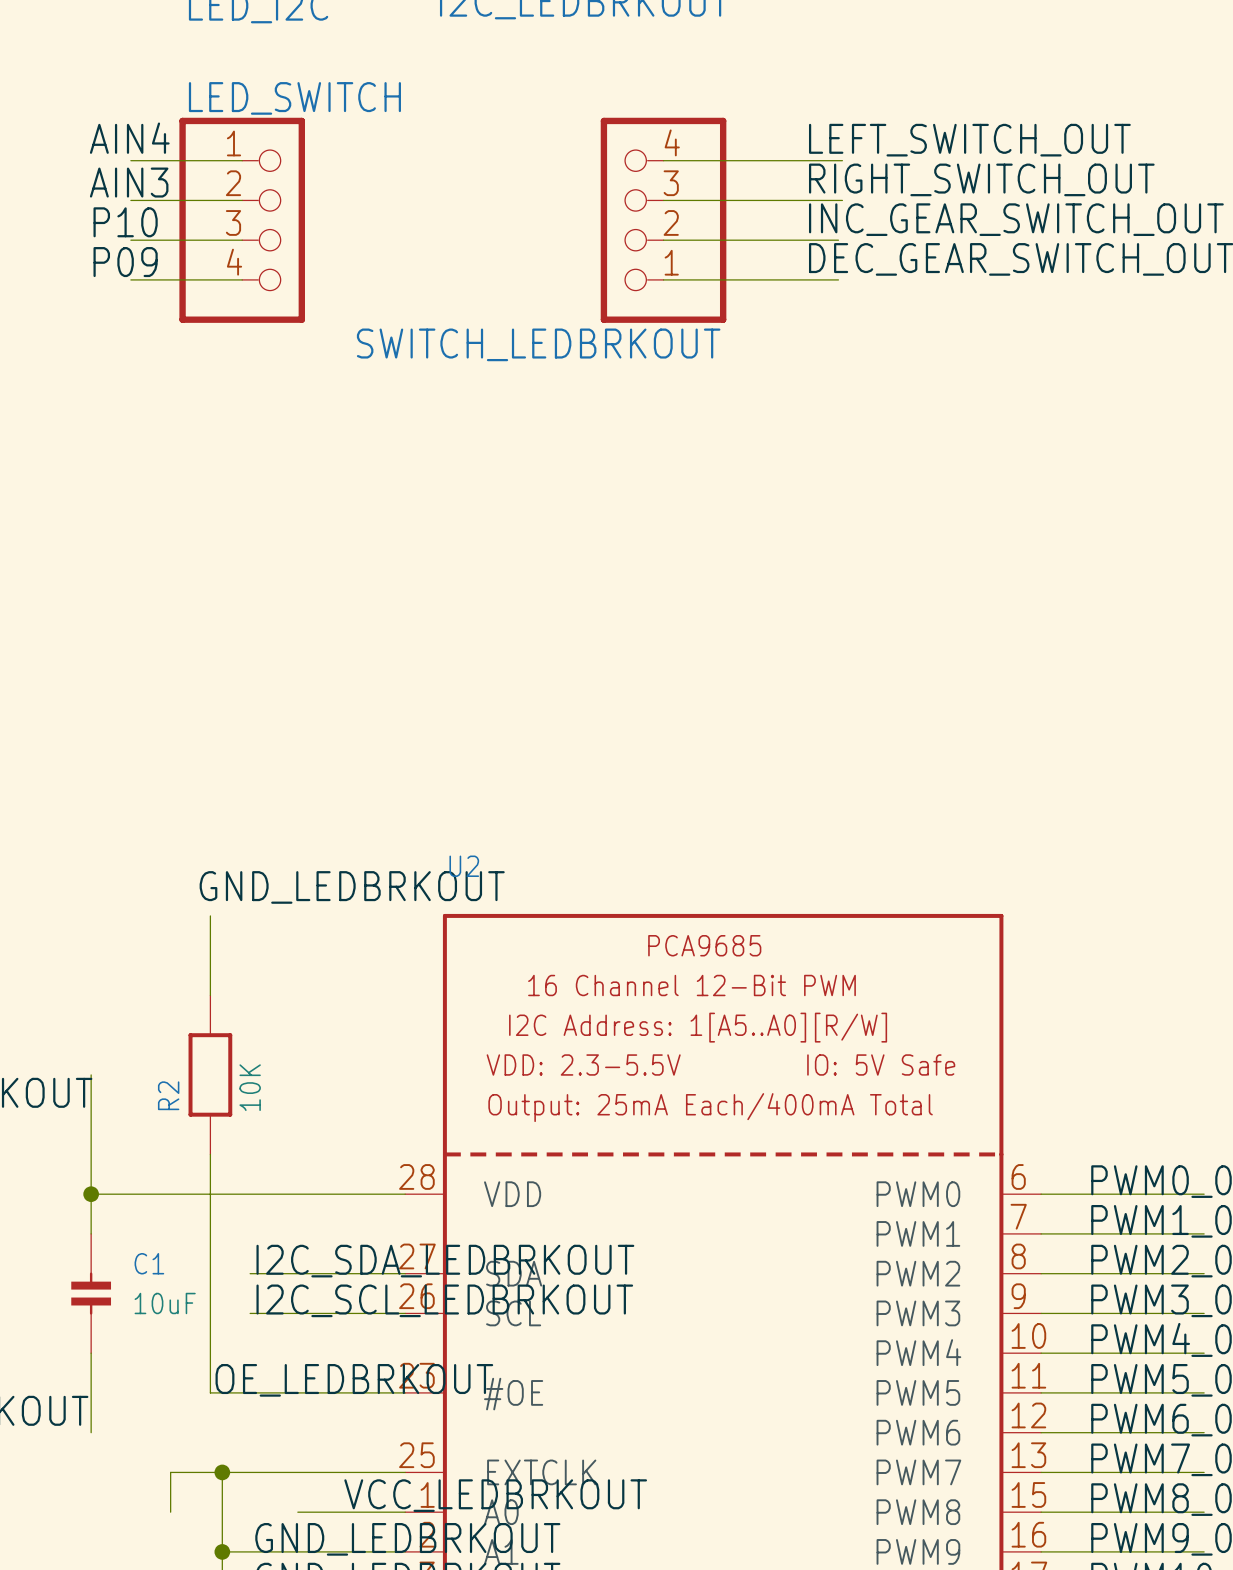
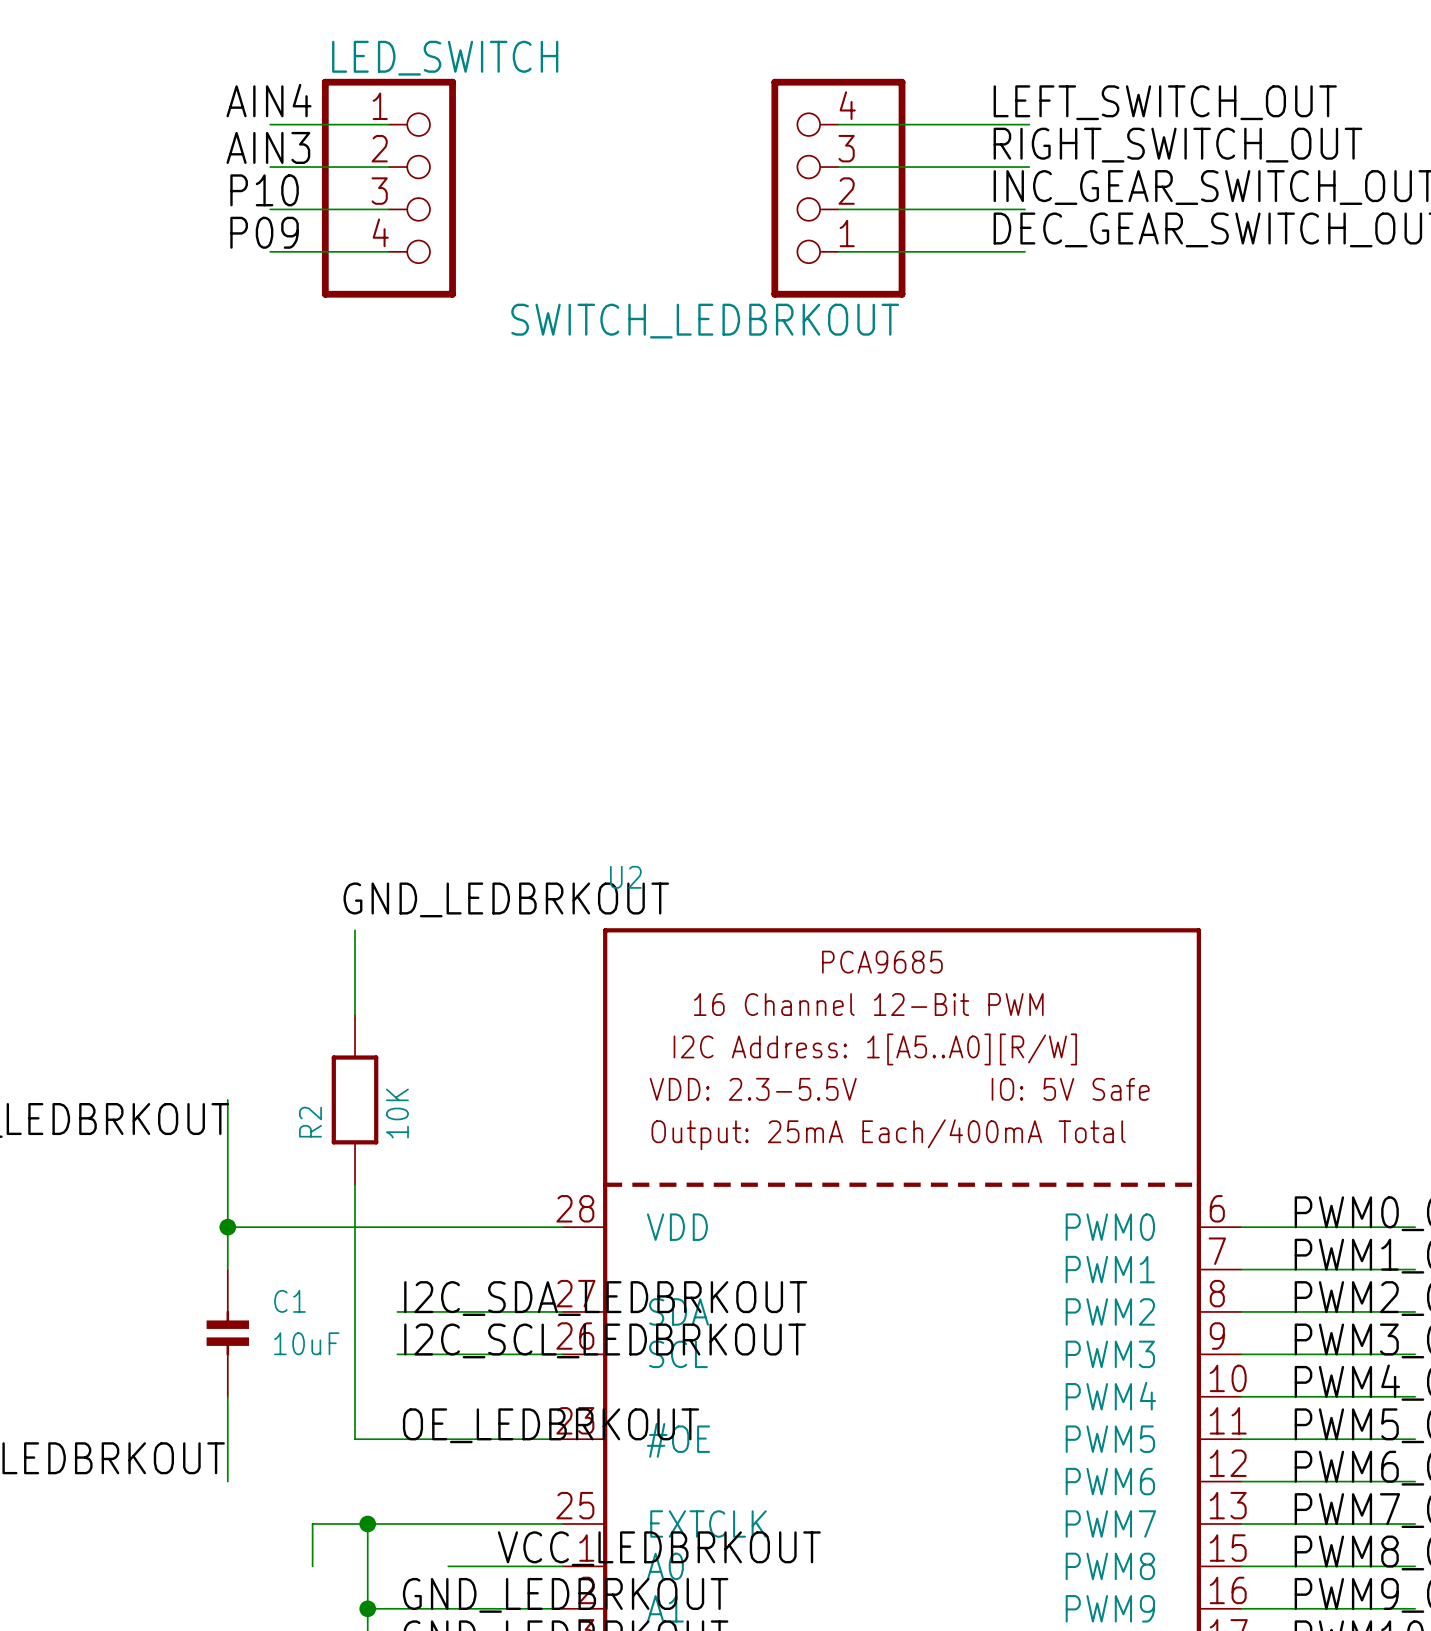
label position: OE_LEDBRKOUT (354, 1380) -> OE_LEDBRKOUT (551, 1425)

